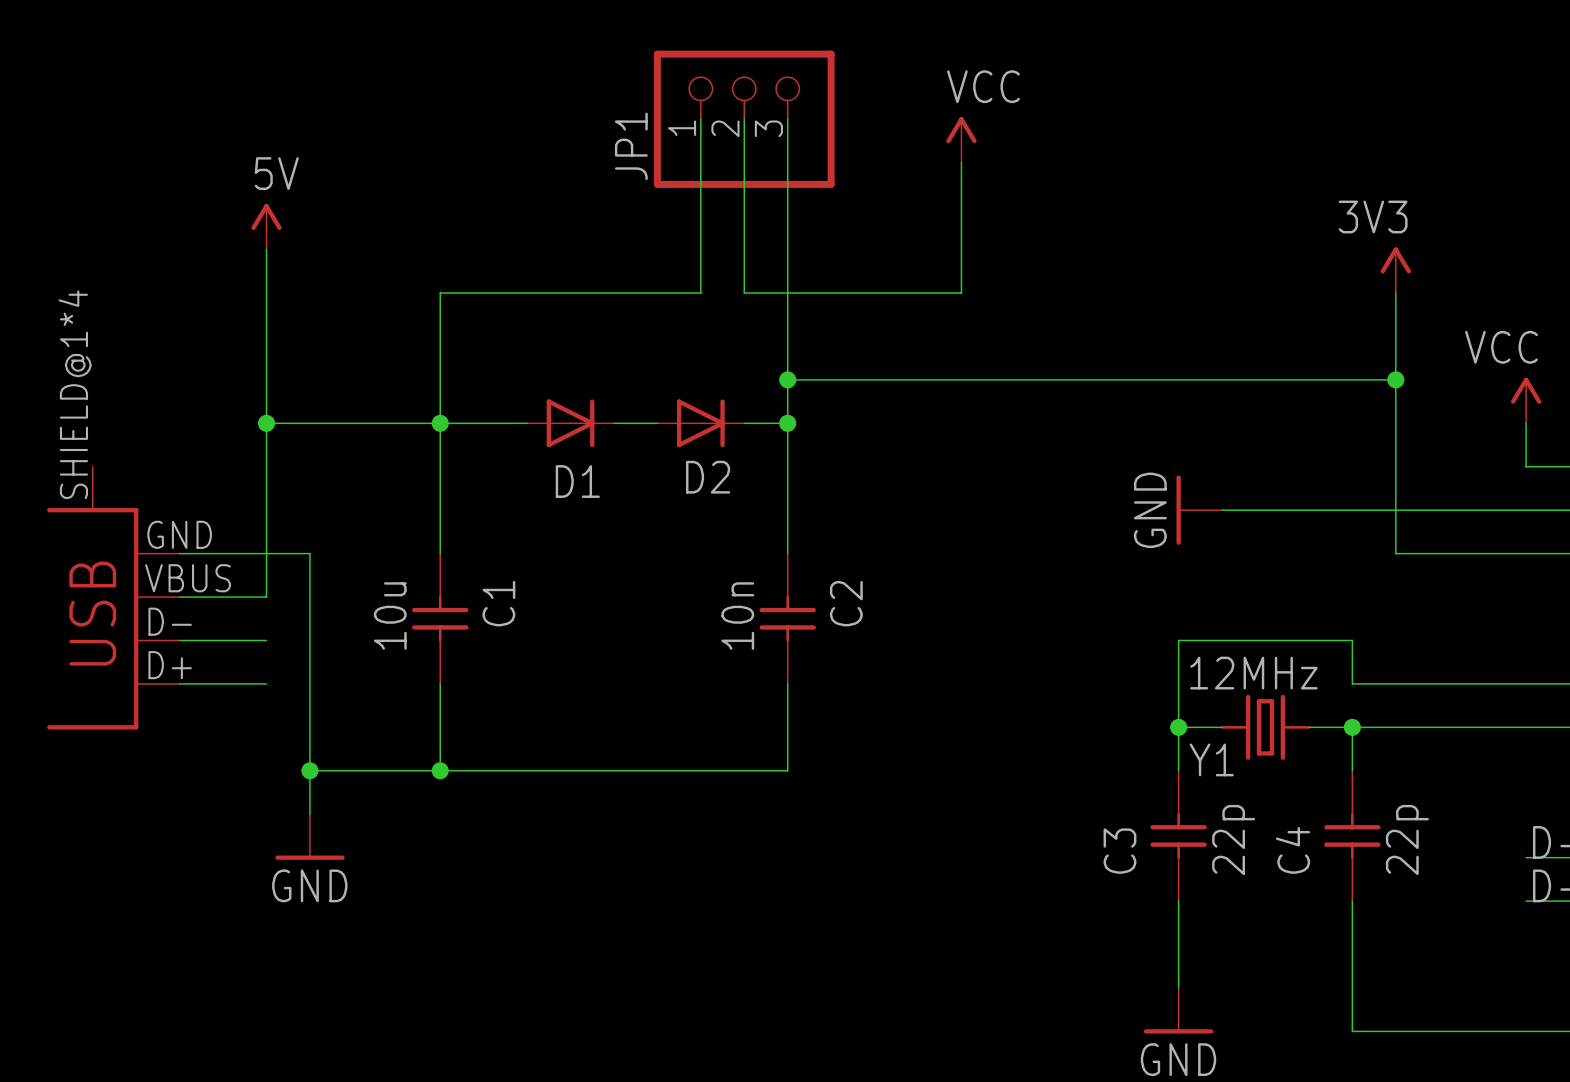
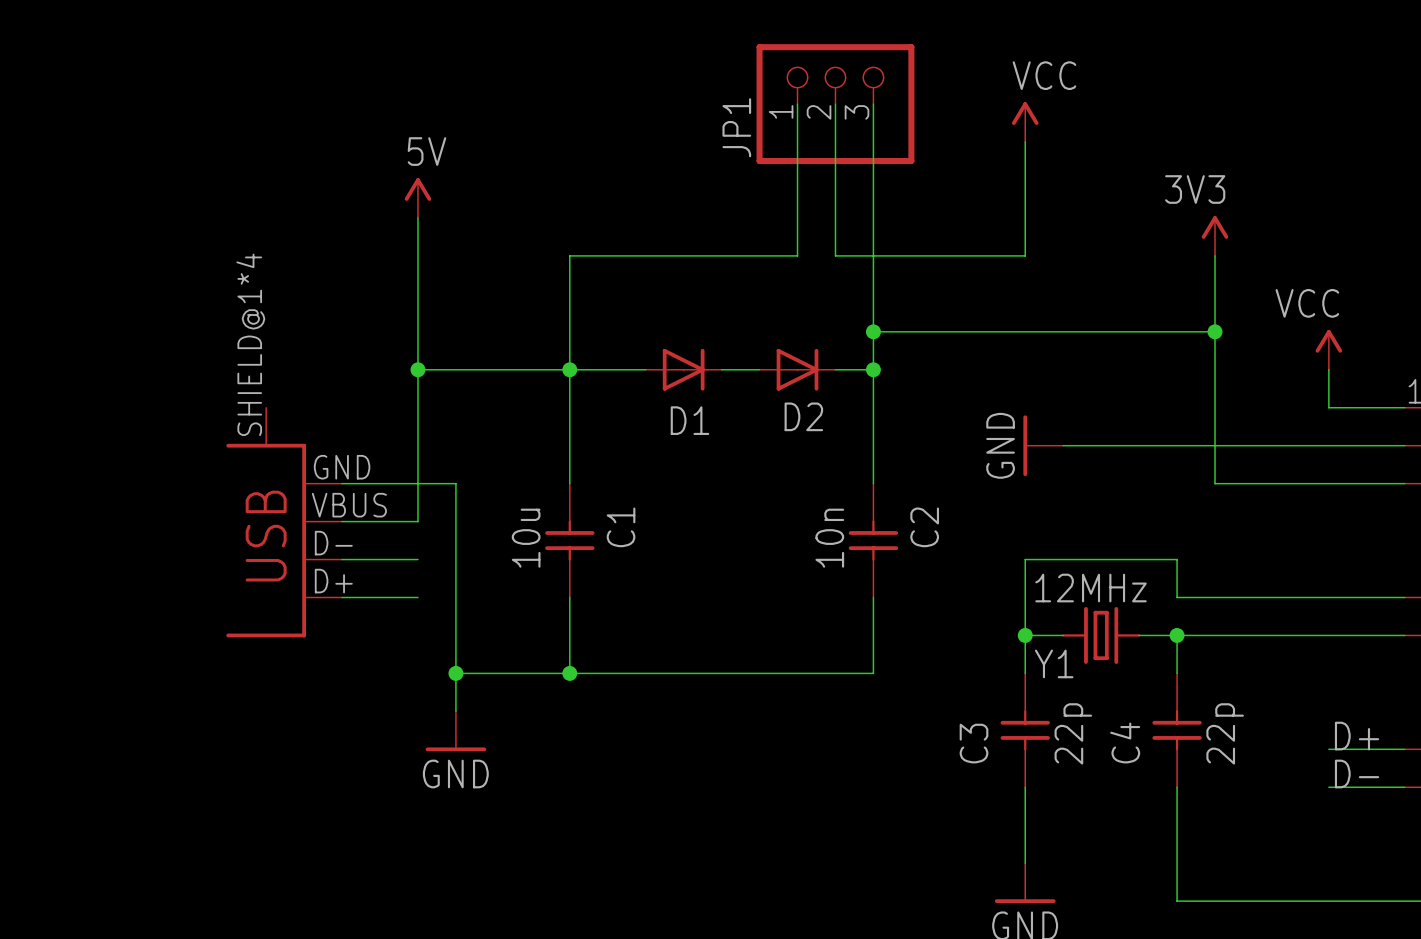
wire: (700, 119) (700, 293) -> (645, 255) (607, 255)
wire: (744, 119) (744, 293) -> none
JP1 position: (744, 119) -> (835, 104)
wire: (787, 119) (787, 553) -> (873, 104) (873, 483)
power symbol position: VCC (961, 139) -> VCC (1025, 122)
wire: none -> (1025, 142) (1025, 255) (835, 255)
power symbol position: 5V (266, 226) -> 5V (417, 198)
wire: (266, 249) (266, 597) (179, 597) -> (417, 217) (417, 521) (342, 521)
wire: (657, 293) (440, 293) (440, 553) -> (569, 255) (569, 483)
wire: (918, 293) (961, 293) -> (797, 255) (797, 104)
wire: (787, 379) (1004, 379) -> none
junction: (787, 379) -> none
junction: none -> (873, 331)
wire: (266, 423) (483, 423) -> none
junction: (266, 423) -> none
junction position: (440, 423) -> (417, 369)
D1 position: (570, 423) -> (683, 369)
junction: none -> (569, 369)
D2 position: (700, 423) -> (797, 369)
junction: (787, 423) -> none
wire: none -> (721, 369) (759, 369)
wire: none -> (835, 369) (873, 369)
junction: none -> (873, 369)
wire: (179, 553) (309, 553) (309, 814) -> (342, 483) (455, 483) (455, 711)
part position: (113, 598) -> (284, 522)
C1 position: (440, 618) -> (569, 540)
C2 position: (787, 618) -> (873, 540)
wire: (179, 640) (266, 640) -> (342, 559) (417, 559)
wire: (179, 683) (266, 683) -> (342, 597) (417, 597)
wire: (440, 683) (440, 770) -> (569, 597) (569, 673)
wire: (787, 683) (787, 770) -> (873, 597) (873, 673) (683, 673)
wire: (309, 770) (527, 770) -> none
junction: (309, 770) -> none
junction position: (440, 770) -> (455, 673)
junction: none -> (569, 673)
power symbol position: GND (309, 837) -> GND (455, 731)

